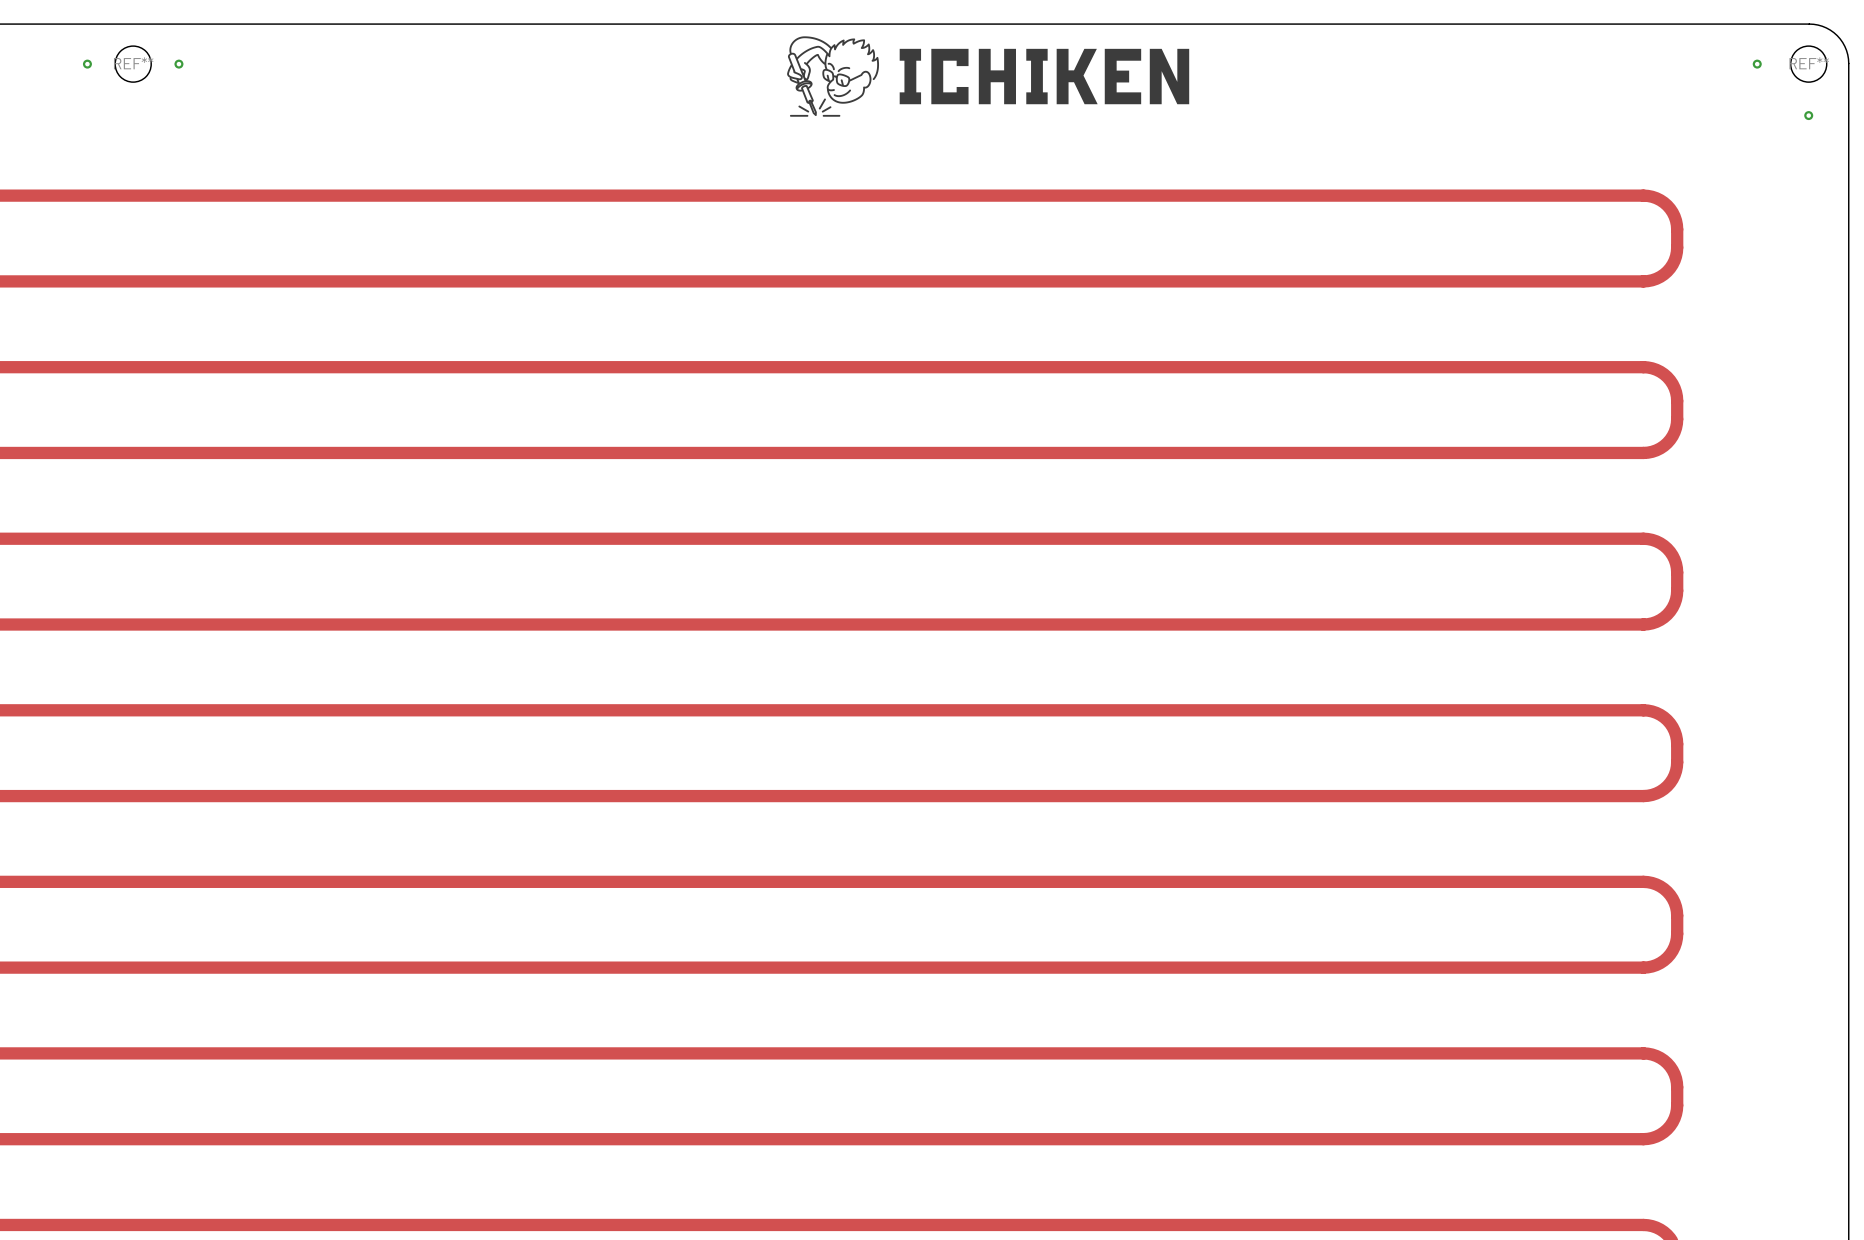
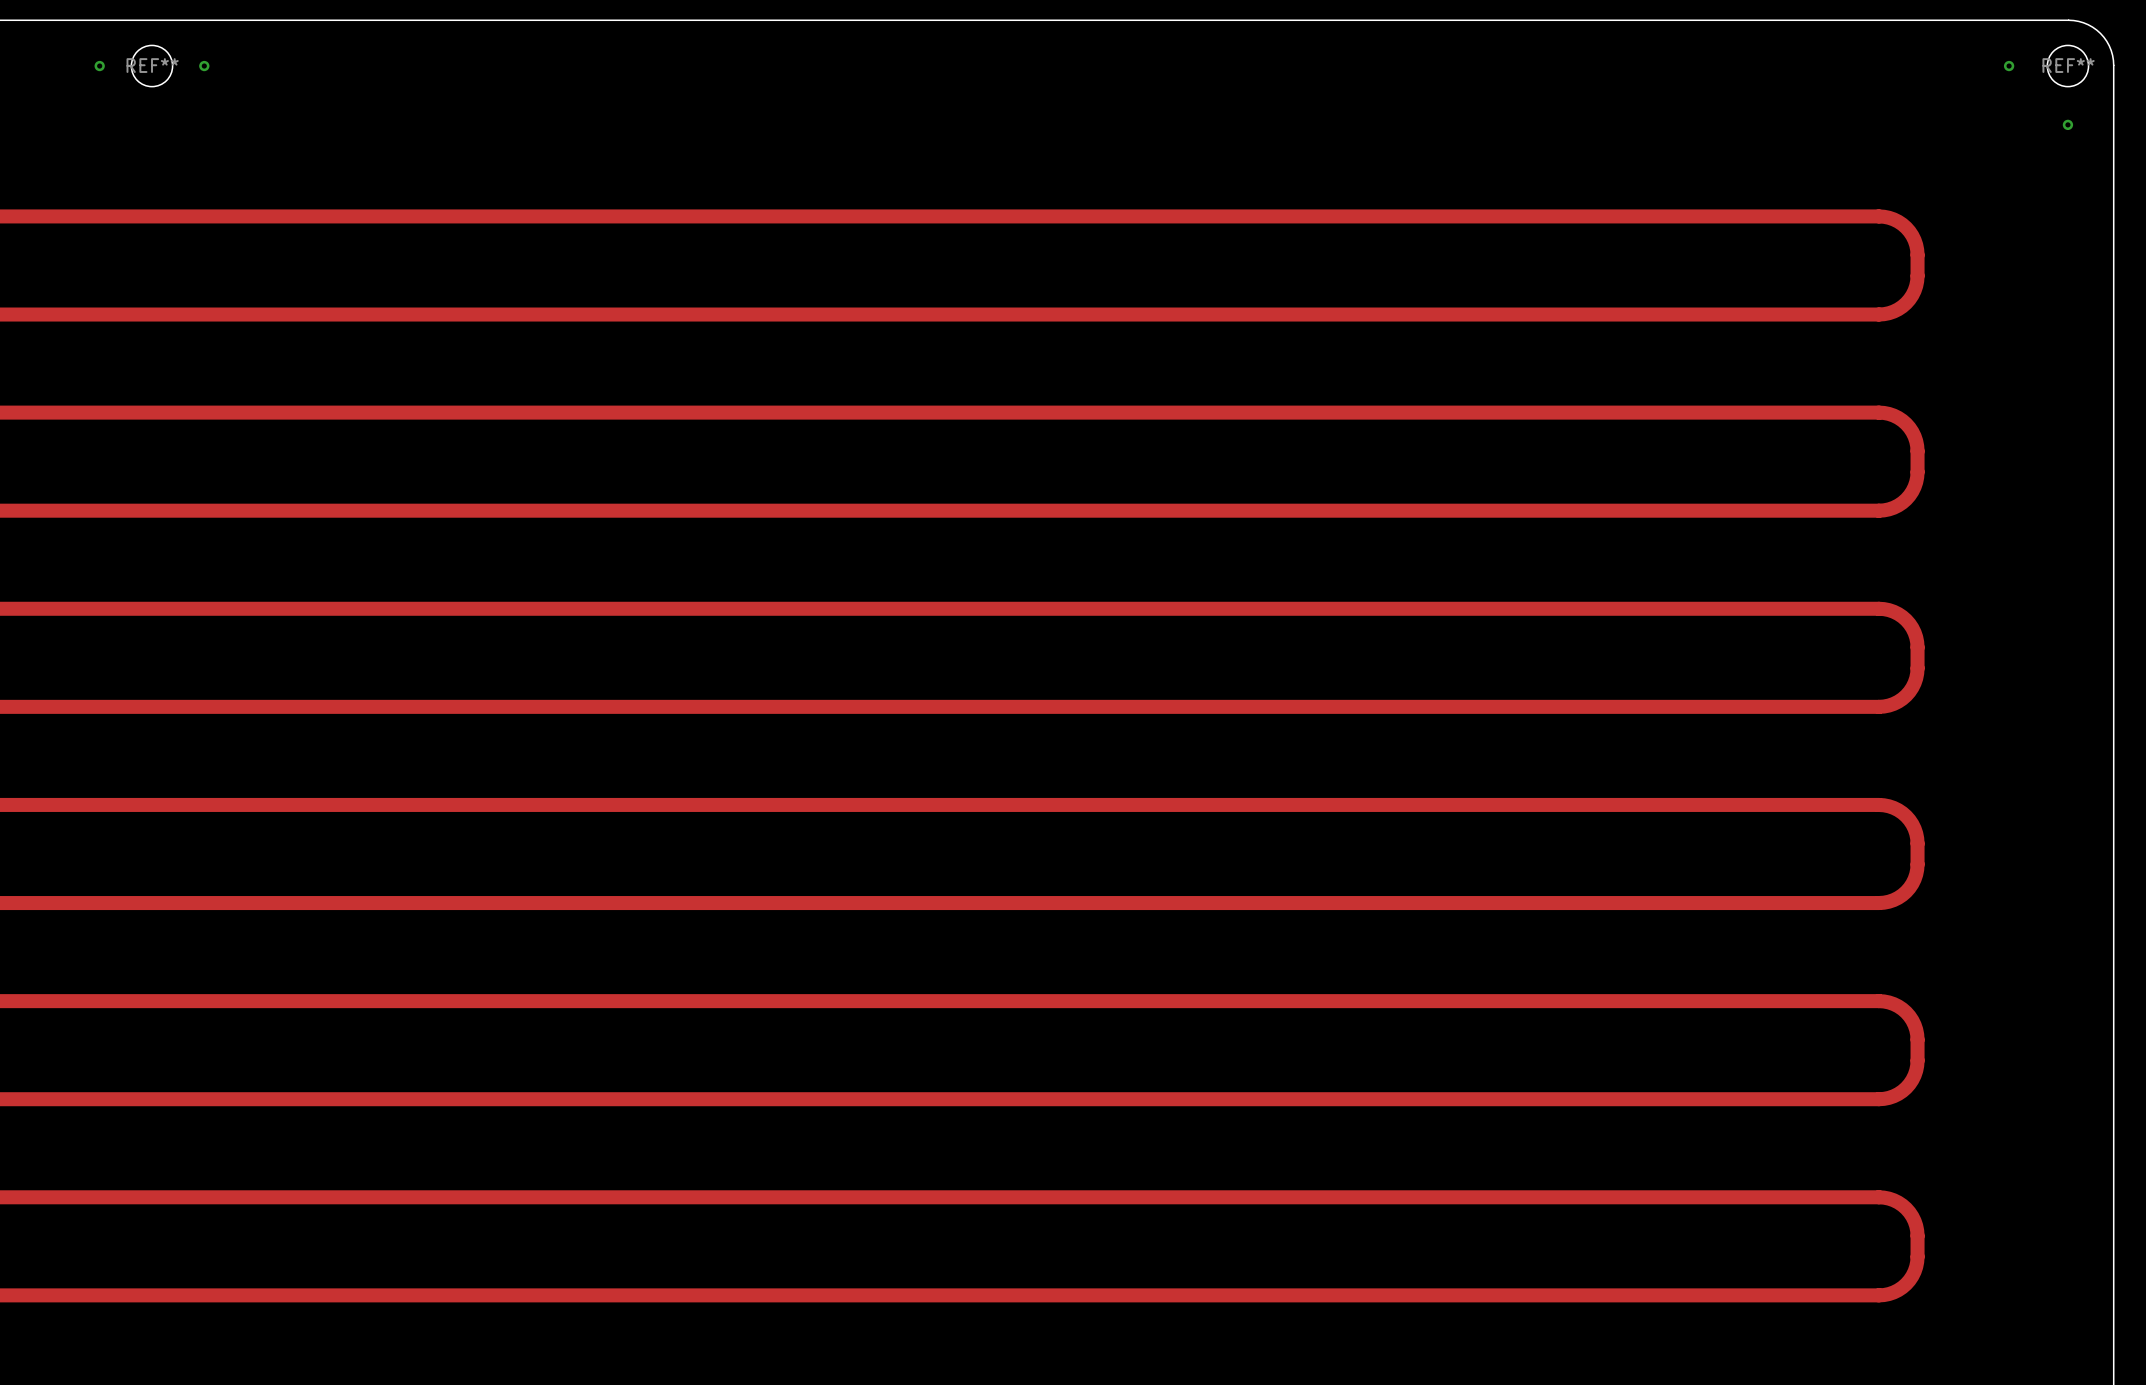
drawing: [787, 36, 880, 117] -> none
drawing: [899, 48, 1190, 105] -> none

